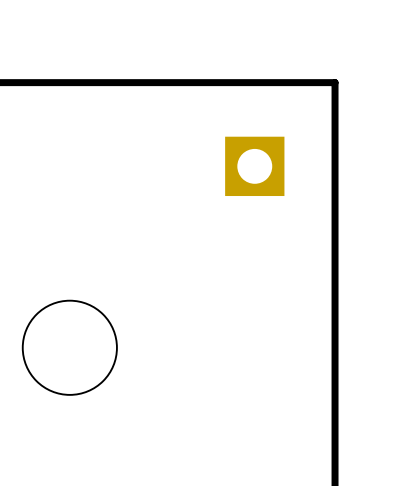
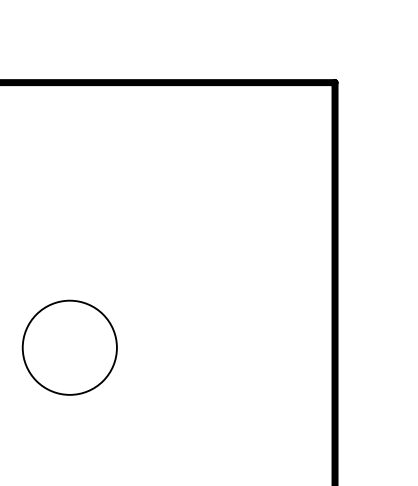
part: (254, 166) -> none

